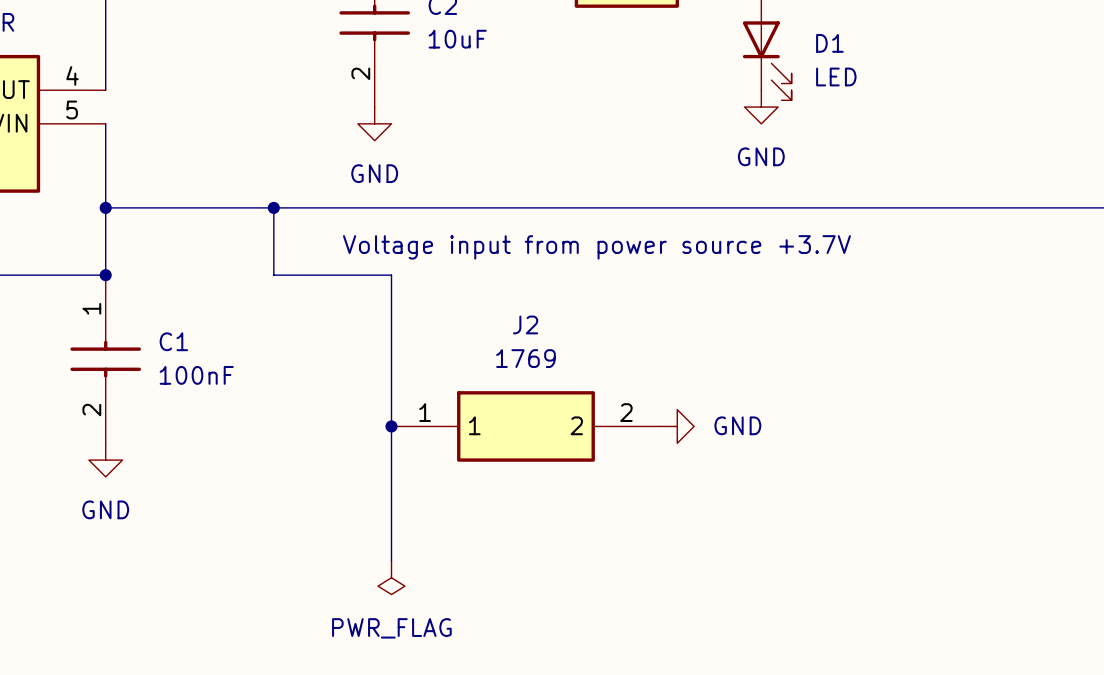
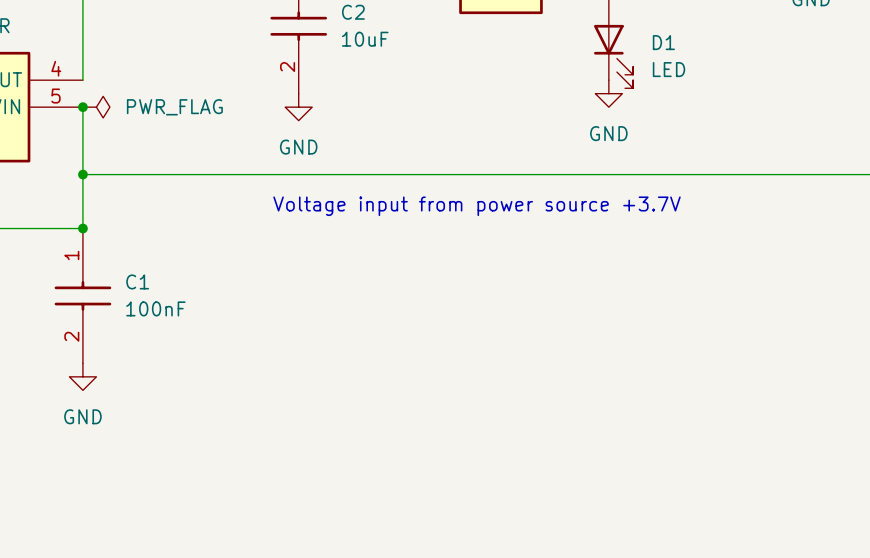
junction: none -> (82, 107)
power symbol: none -> PWR_FLAG (96, 107)
wire: (273, 207) (273, 275) (391, 275) (391, 560) -> none
junction: (273, 207) -> none
junction: (391, 426) -> none
J2: 1769 (525, 426) -> none
power symbol: GND (677, 426) -> none
power symbol: PWR_FLAG (391, 577) -> none

